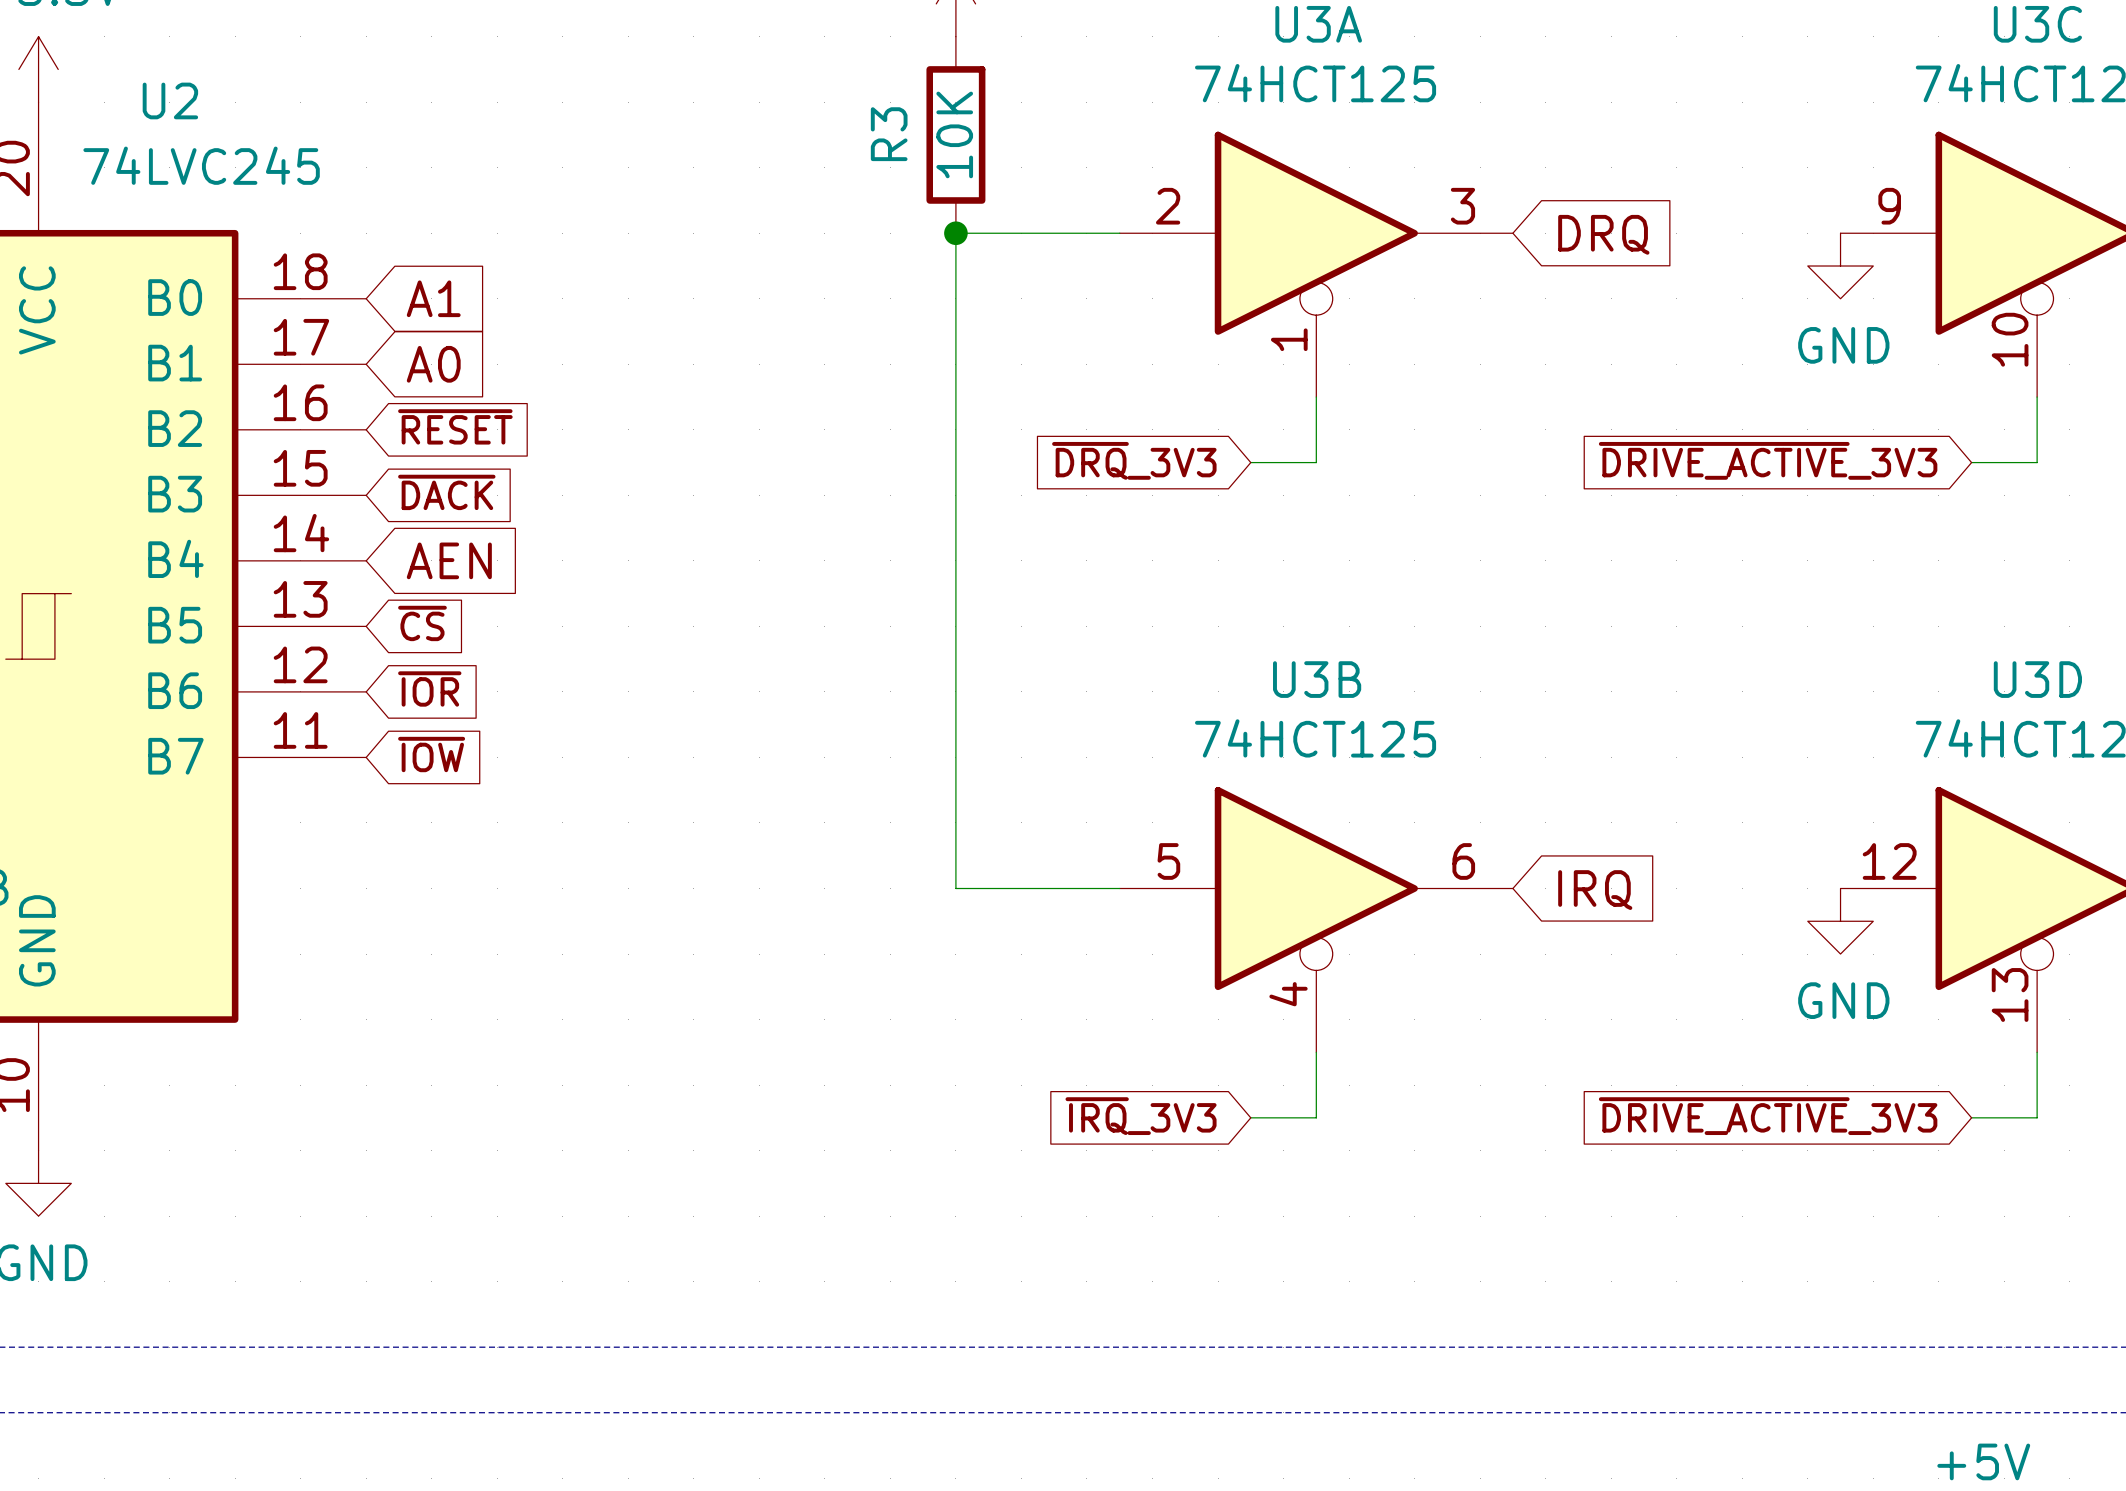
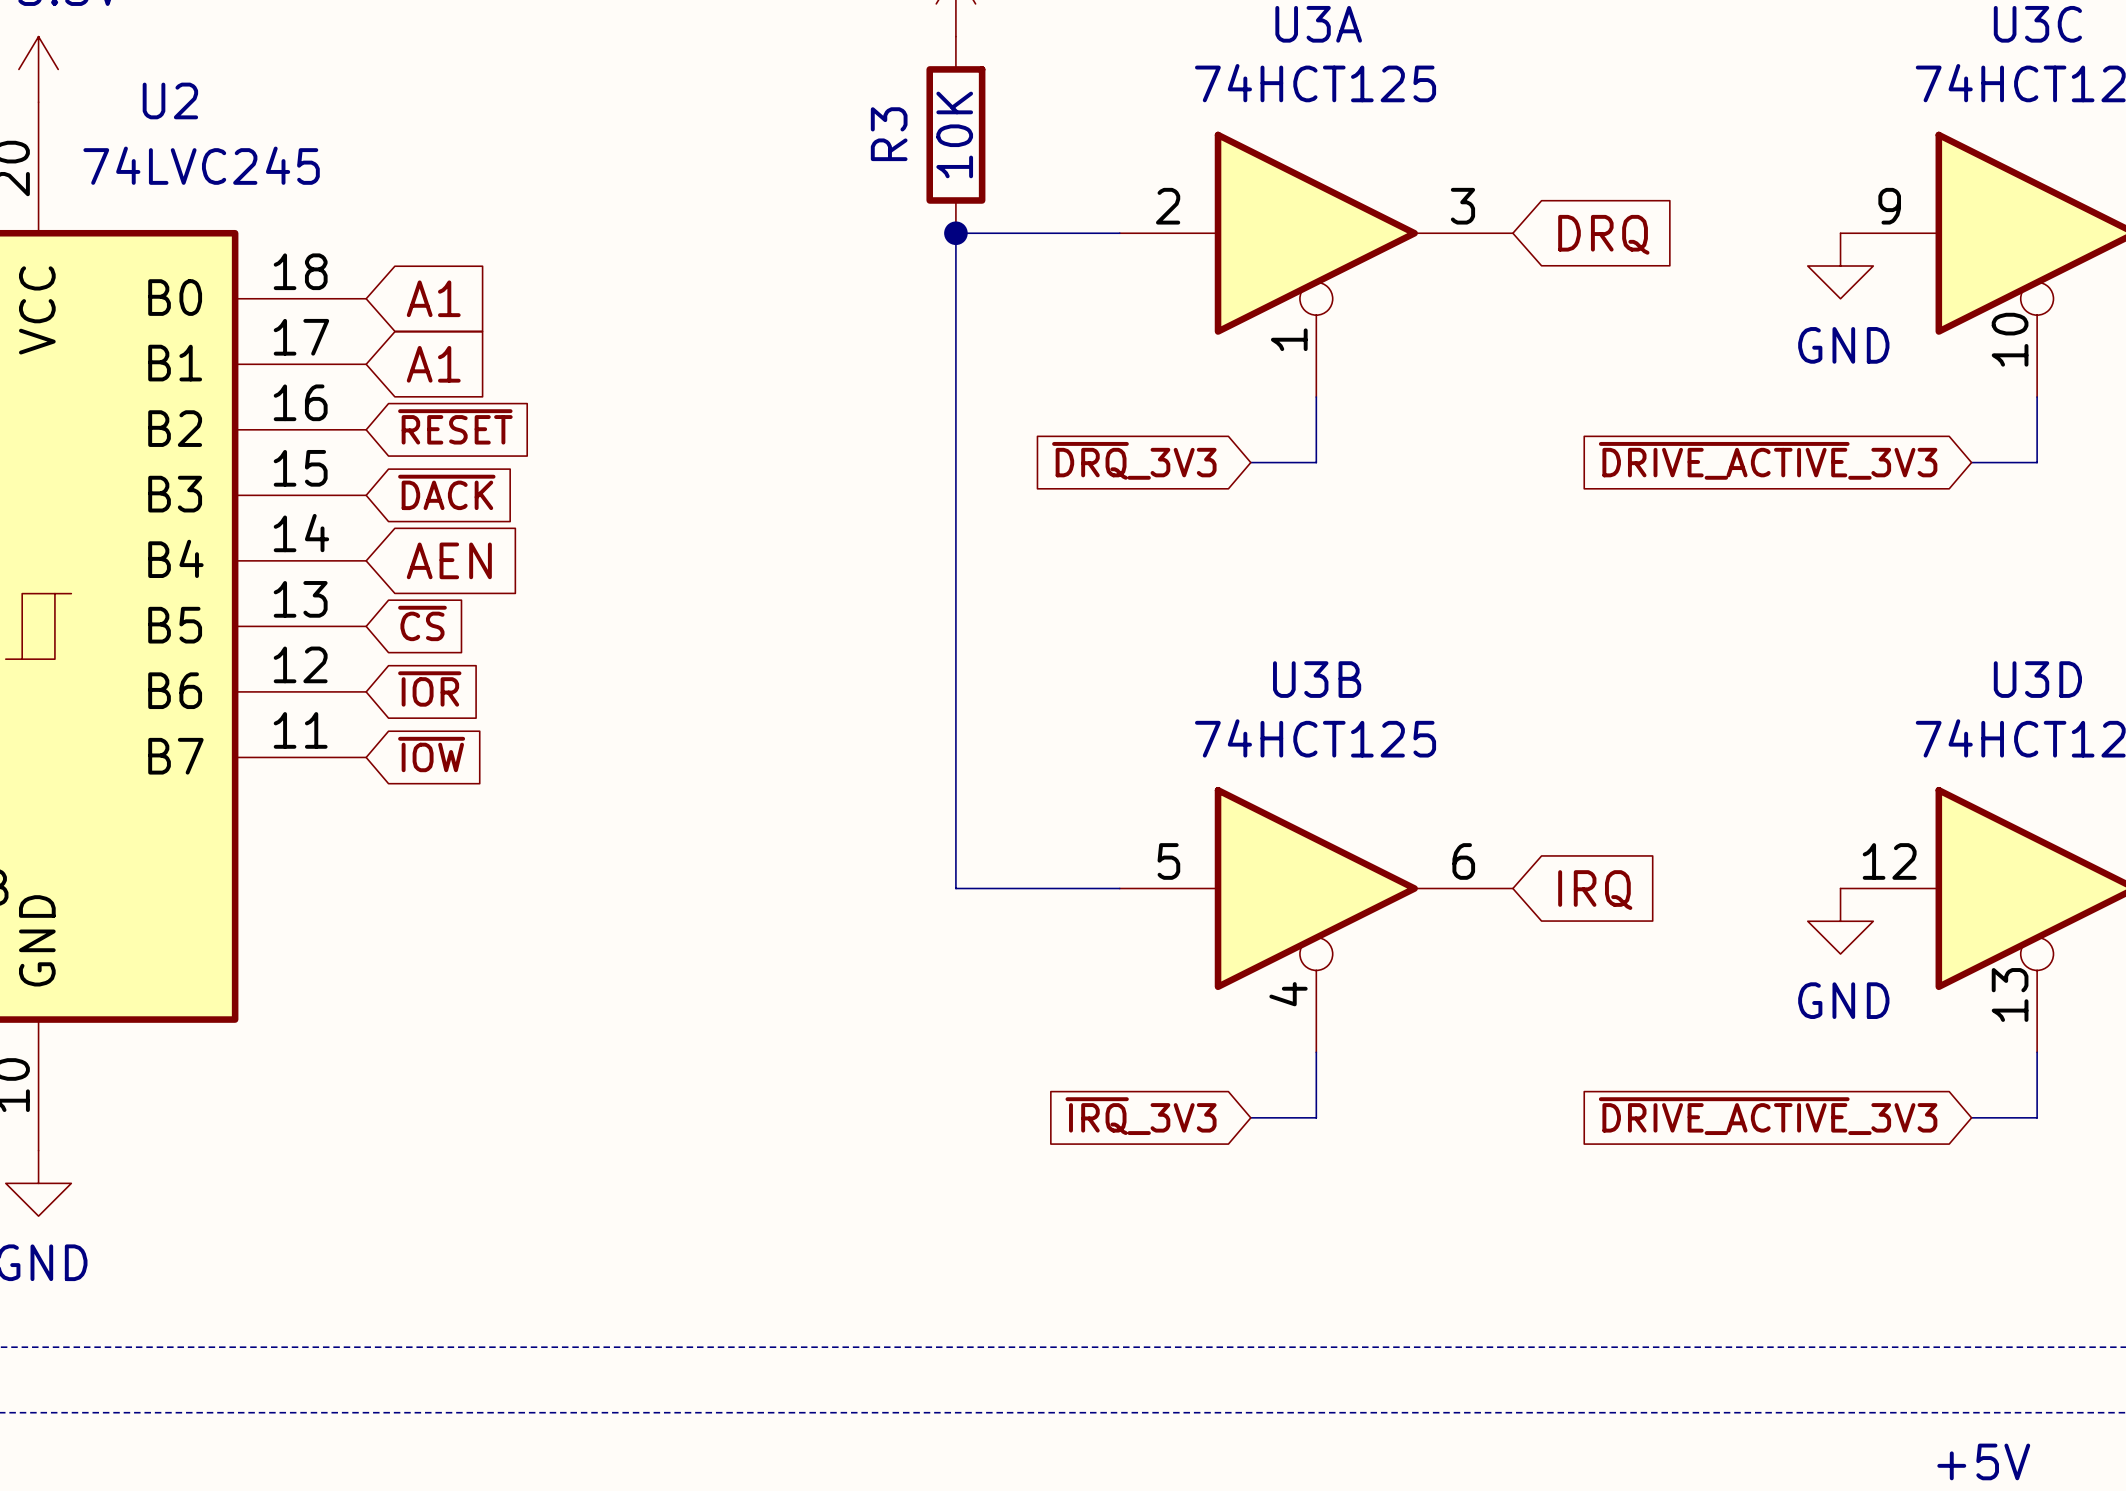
global label: A0 (433, 364) -> A1 (433, 364)

